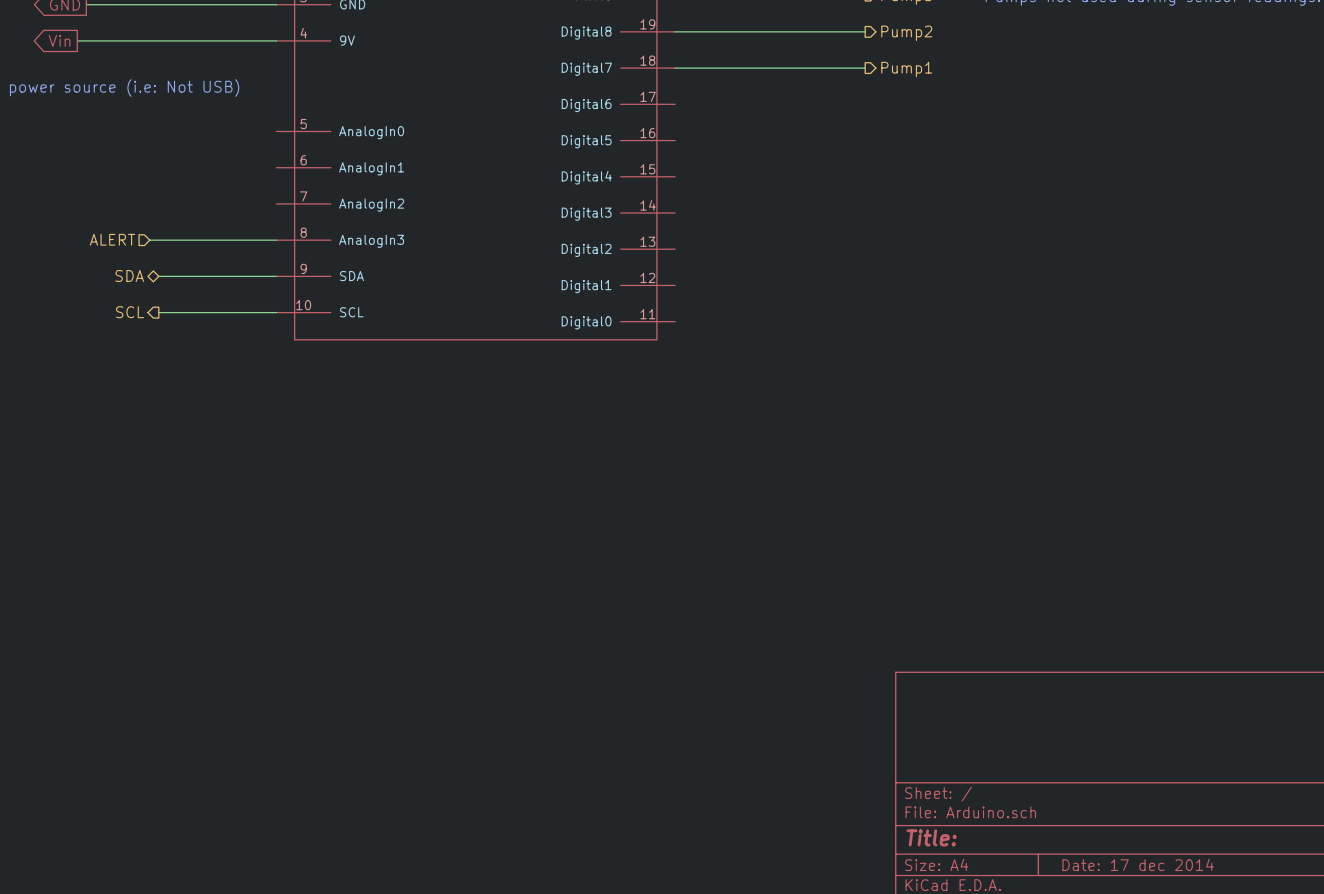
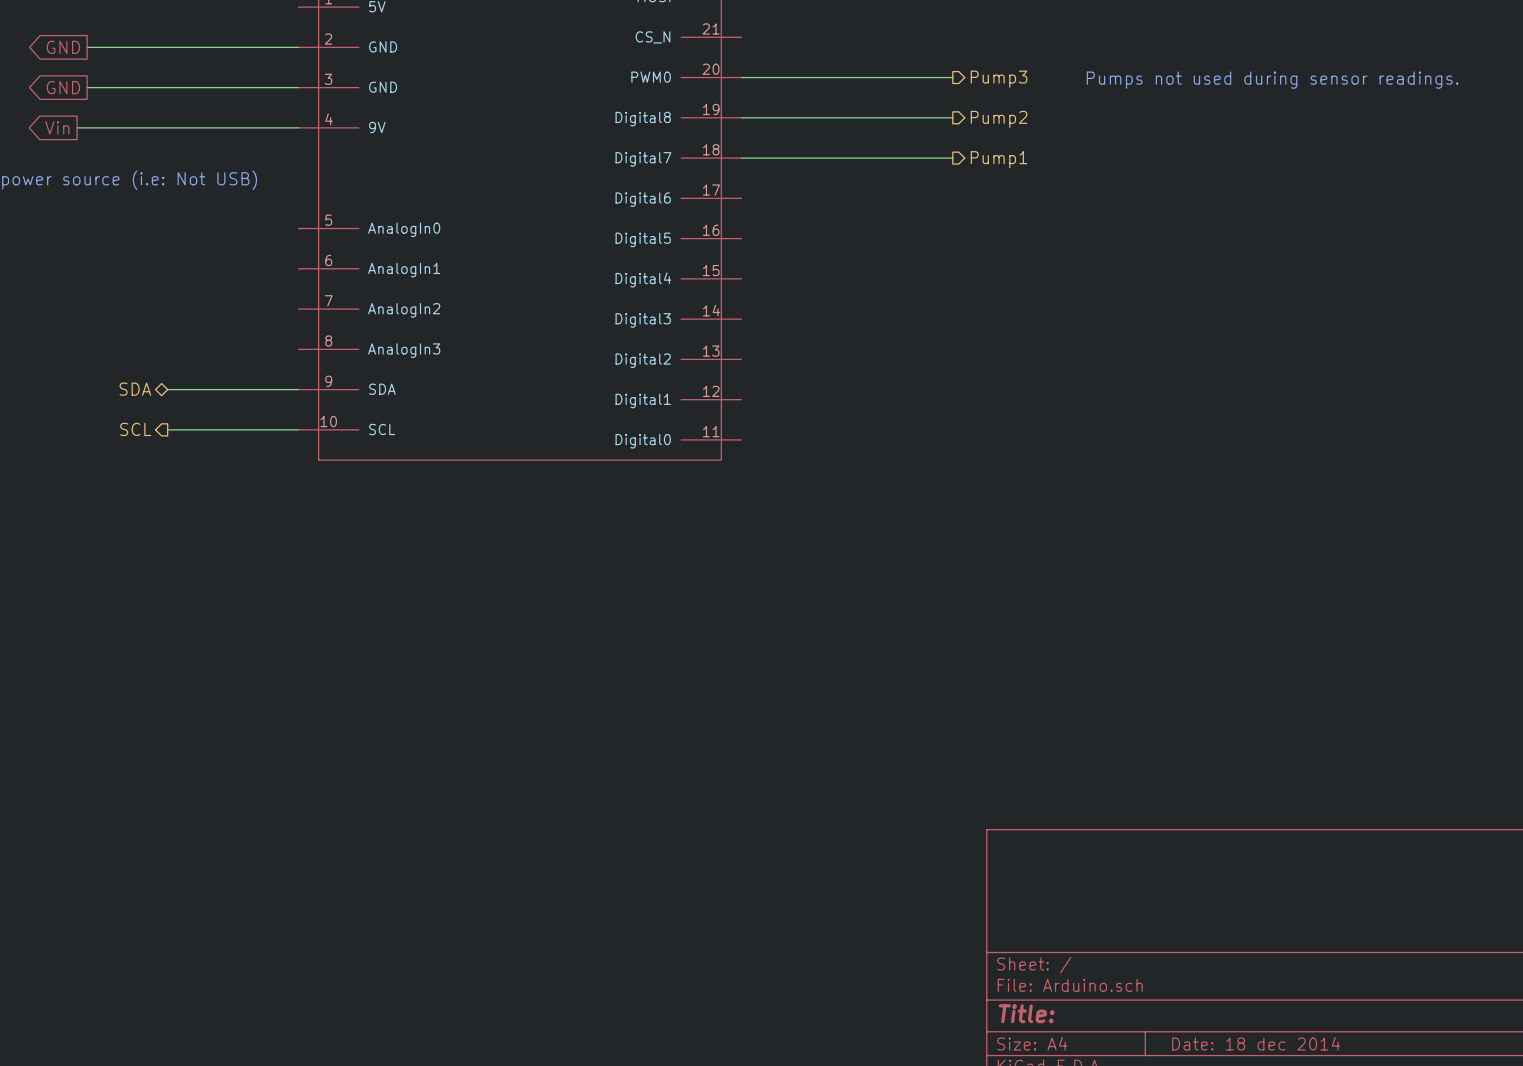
hierarchical label: ALERT (112, 239) -> none
wire: (149, 240) (276, 240) -> none
title block: Date: 17 dec 2014 (1138, 864) -> Date: 18 dec 2014 (1256, 1043)

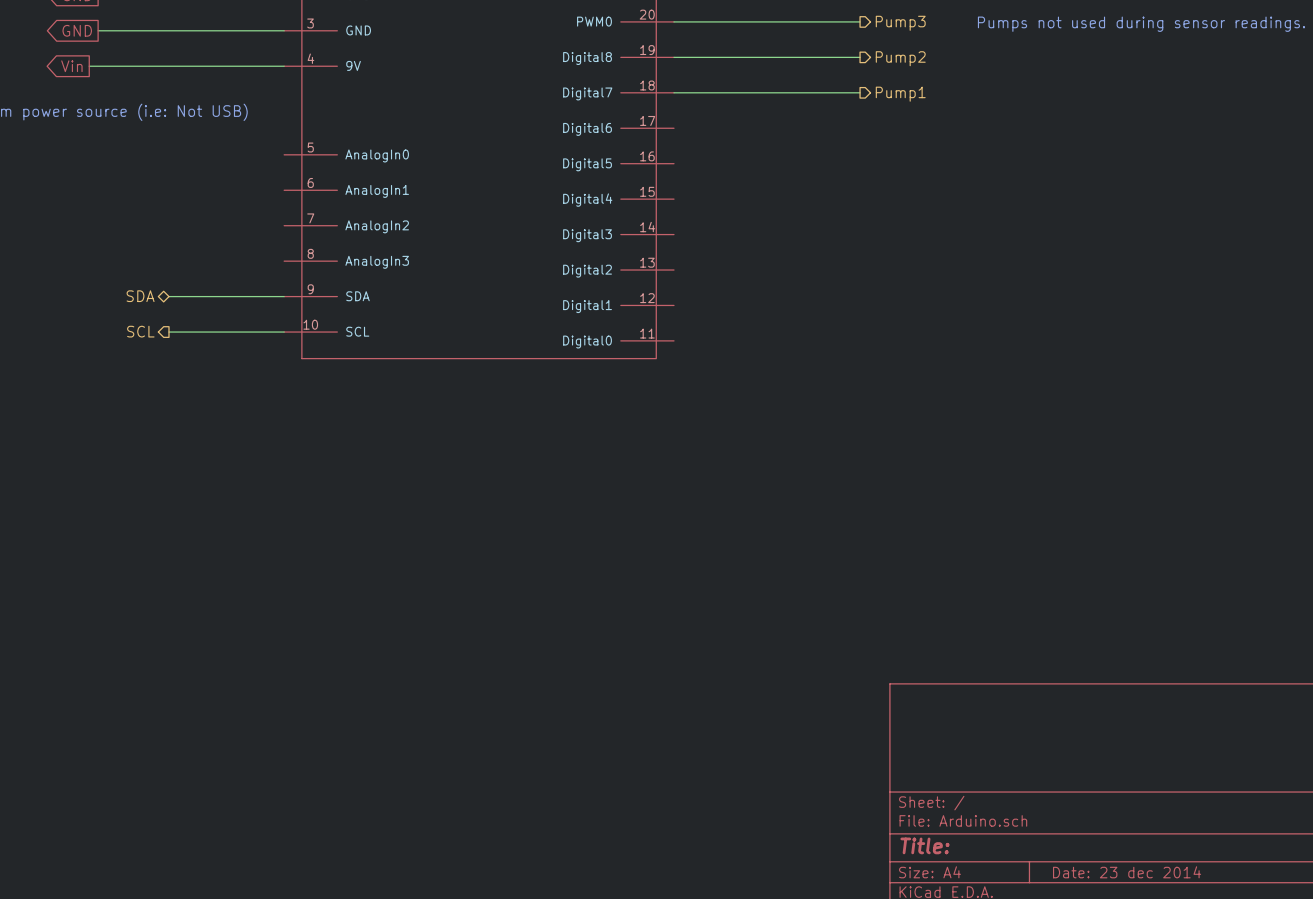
title block: Date: 18 dec 2014 (1256, 1043) -> Date: 23 dec 2014 (1127, 872)

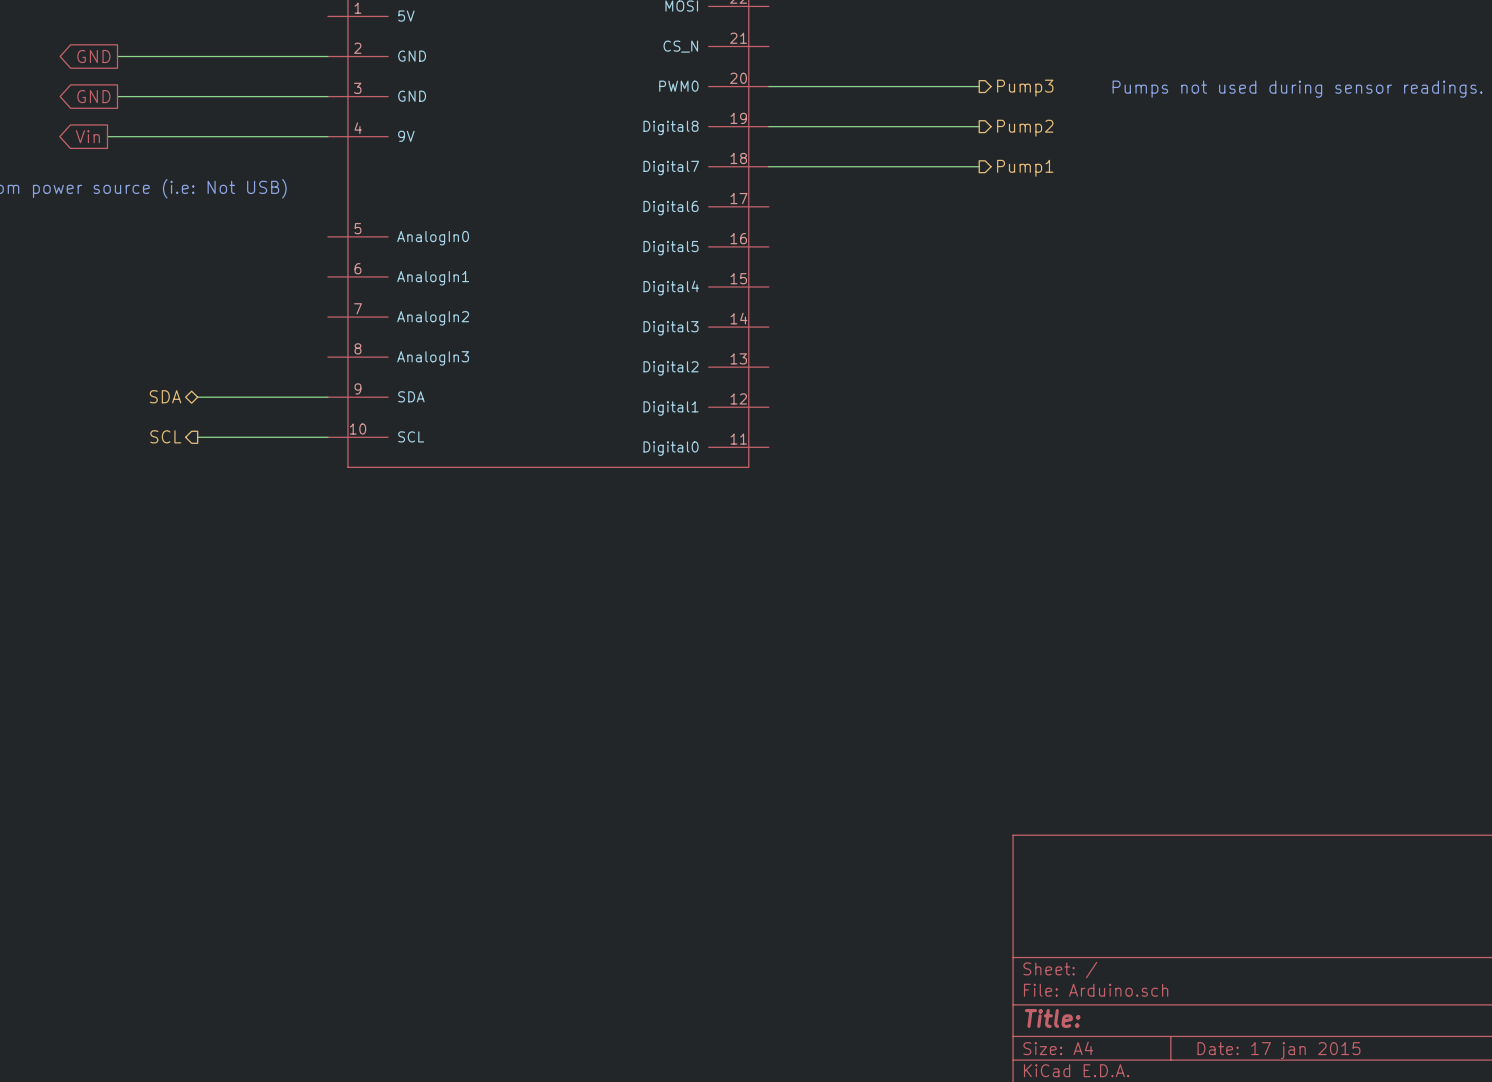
title block: Date: 23 dec 2014 (1127, 872) -> Date: 17 jan 2015 (1278, 1050)

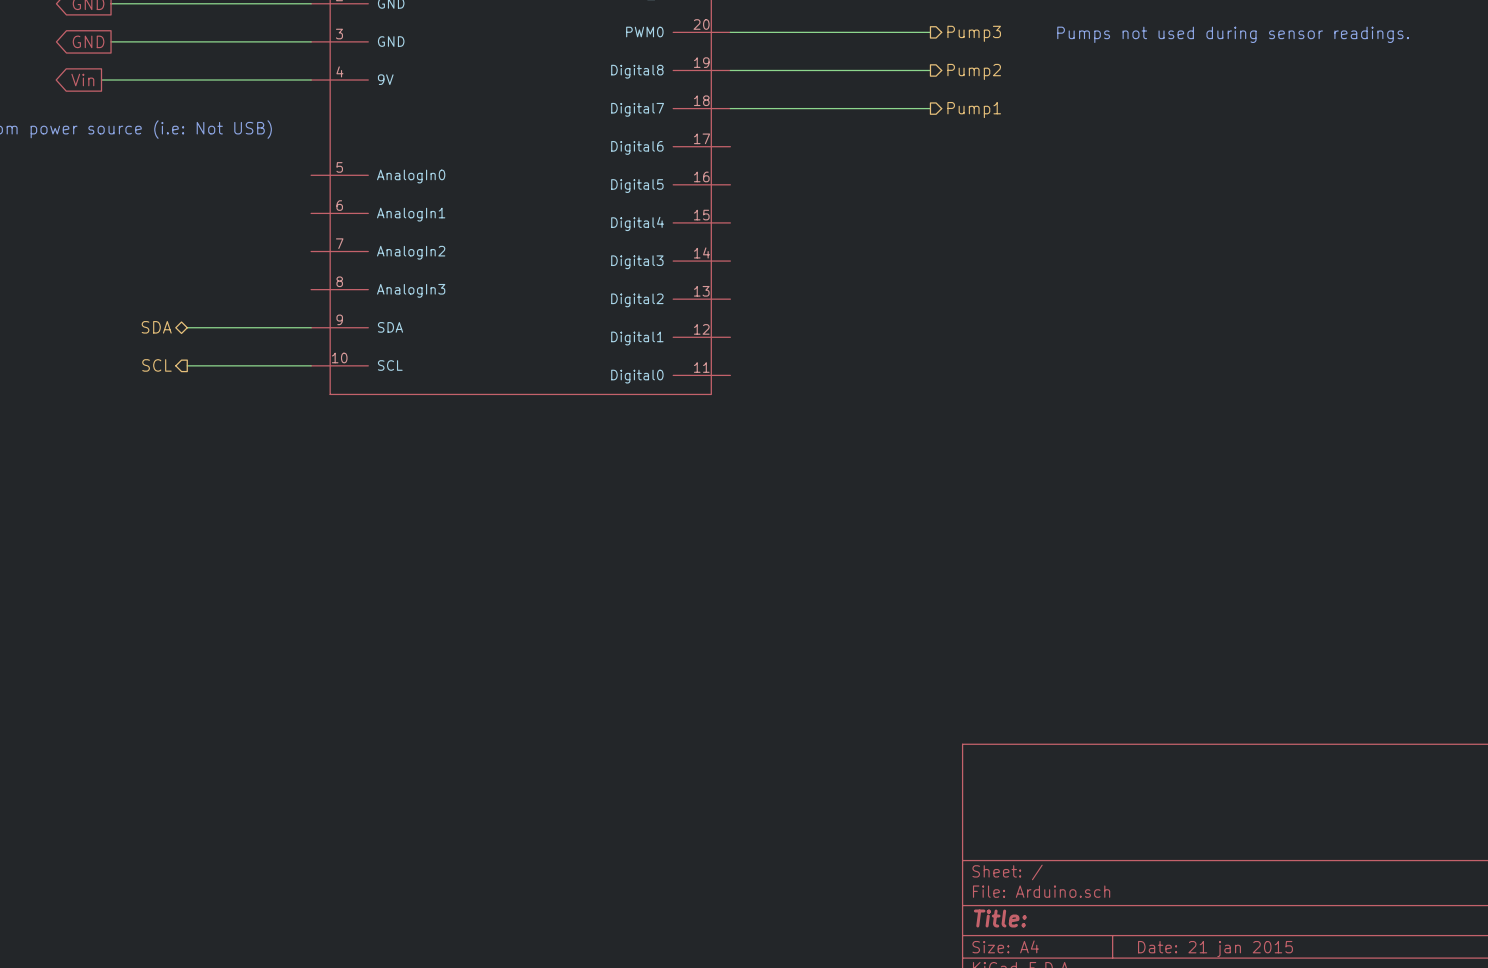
title block: Date: 17 jan 2015 (1278, 1050) -> Date: 21 jan 2015 (1215, 949)

